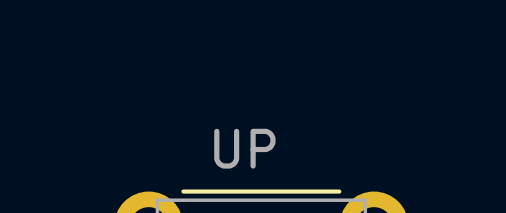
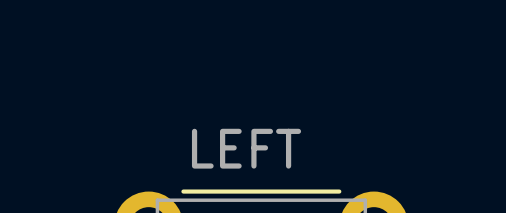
part value: UP (244, 148) -> LEFT (246, 148)

